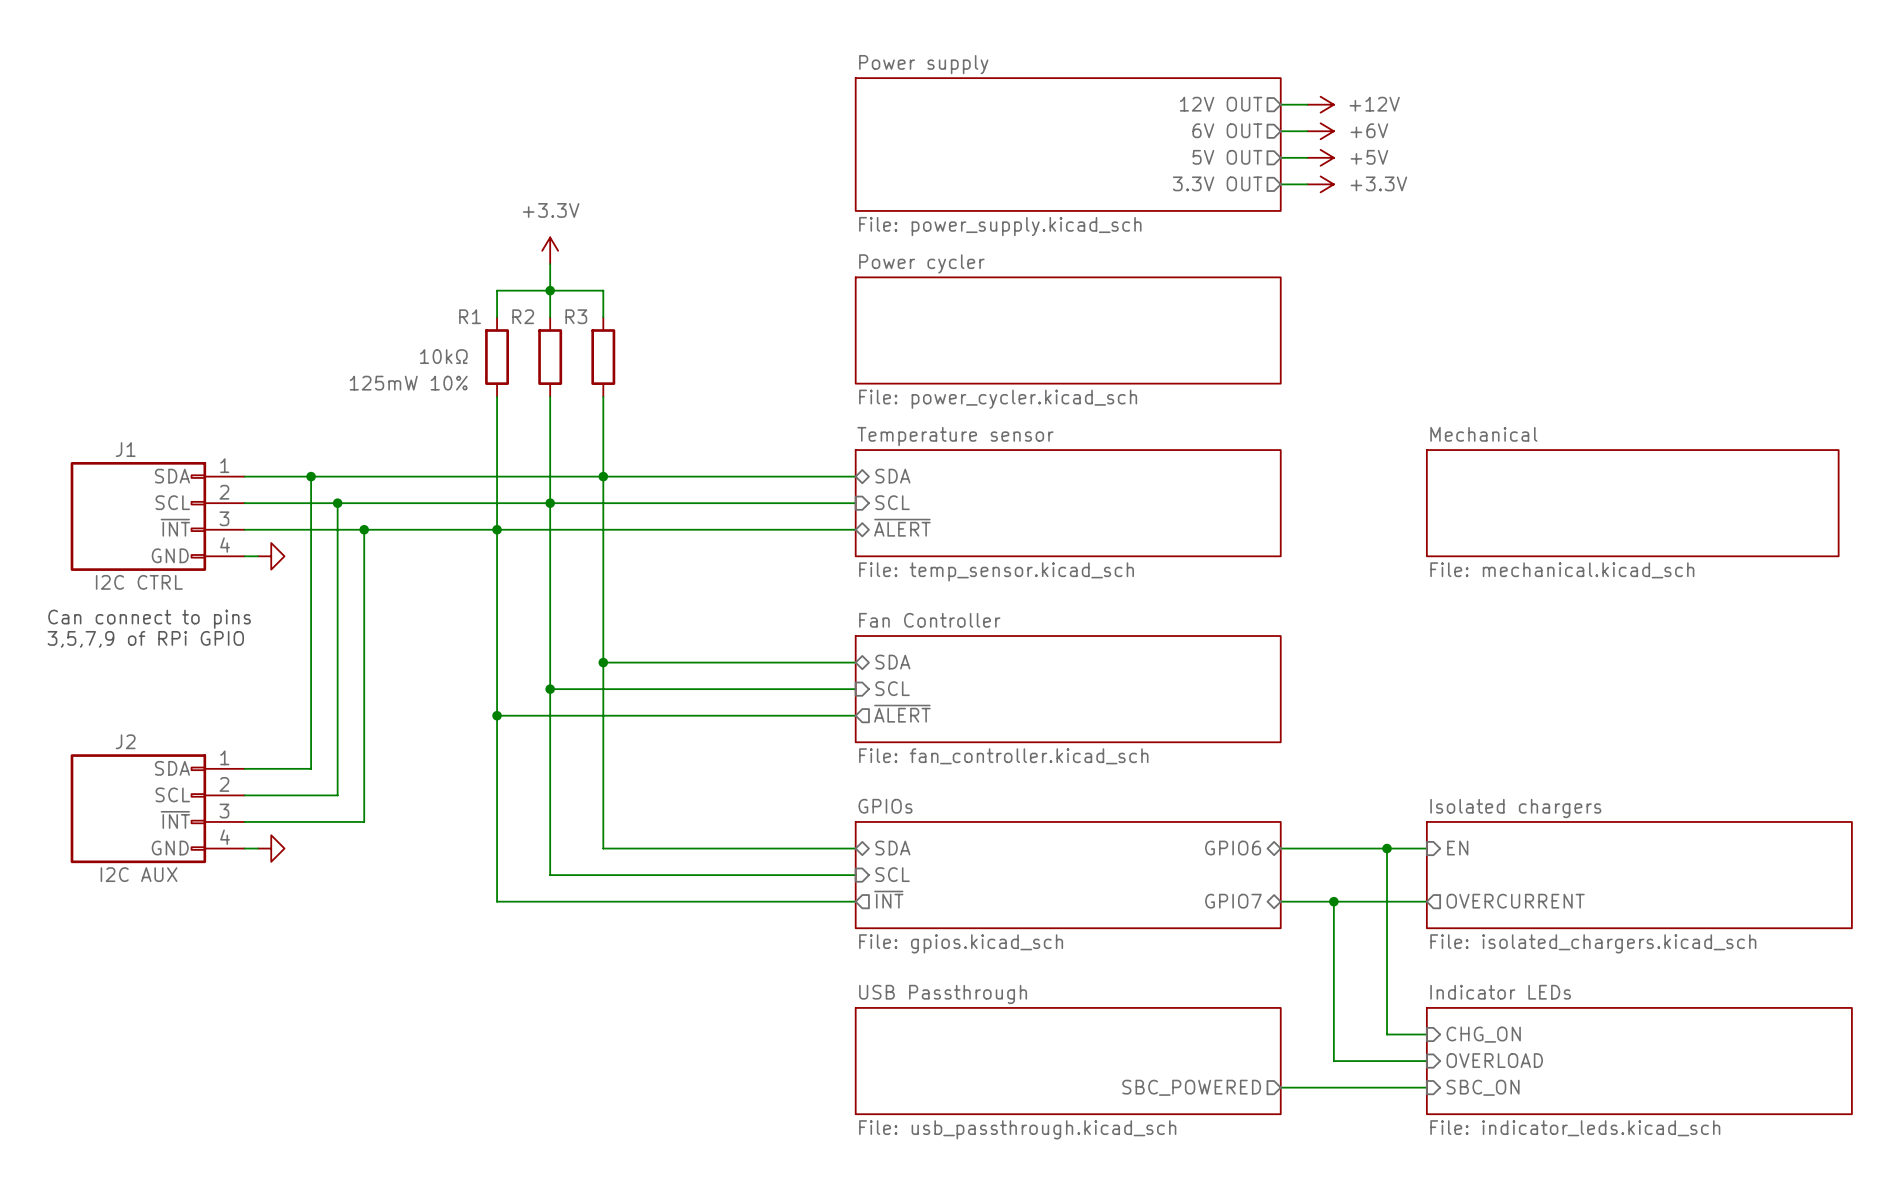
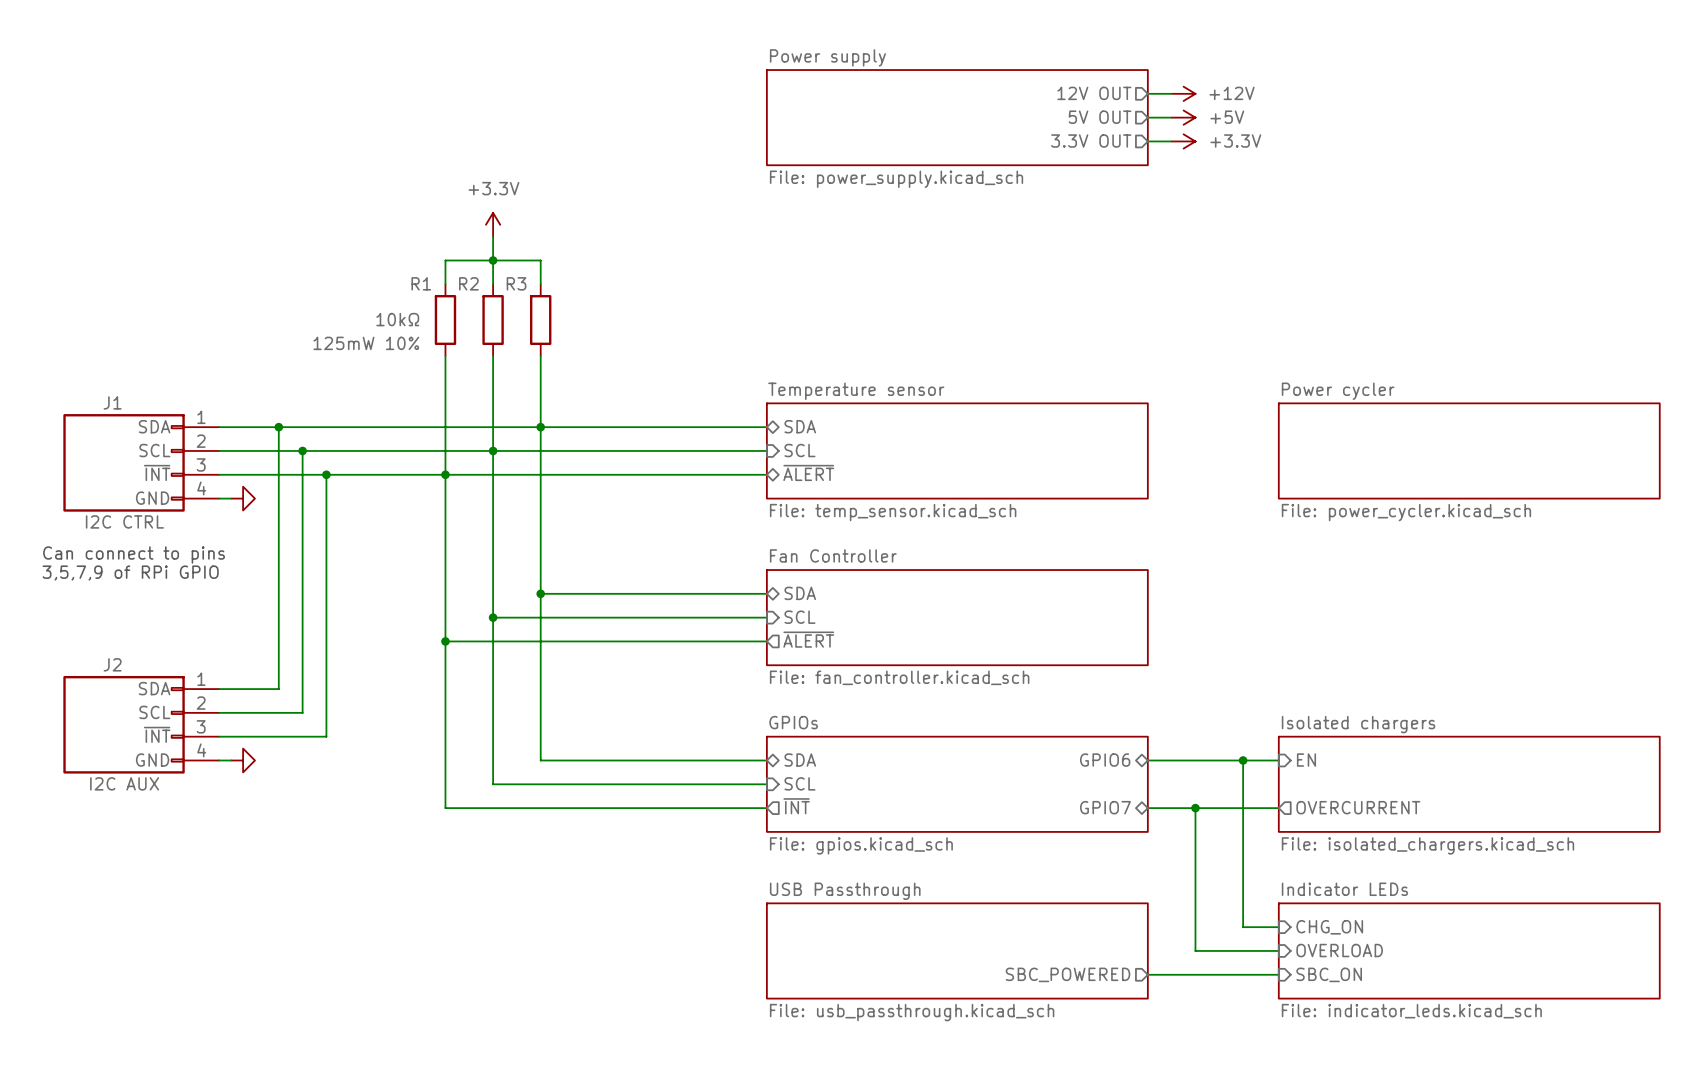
sheet pin: 6V OUT (1227, 130) -> 5V OUT (1100, 117)
sheet Power supply: none -> File: power_supply.kicad_sch (957, 117)
power symbol: +6V (1320, 131) -> +5V (1183, 117)
sheet Power supply: File: power_supply.kicad_sch (1068, 144) -> none
sheet pin: 5V OUT (1227, 157) -> 3.3V OUT (1091, 141)
power symbol: +5V (1320, 157) -> +3.3V (1183, 141)
sheet pin: 3.3V OUT (1217, 183) -> none
wire: (1280, 184) (1307, 184) -> none
power symbol: +3.3V (1320, 184) -> none
sheet Power cycler: File: power_cycler.kicad_sch (1068, 330) -> none
sheet Mechanical: File: mechanical.kicad_sch (1632, 503) -> none
sheet Power cycler: none -> File: power_cycler.kicad_sch (1469, 450)

